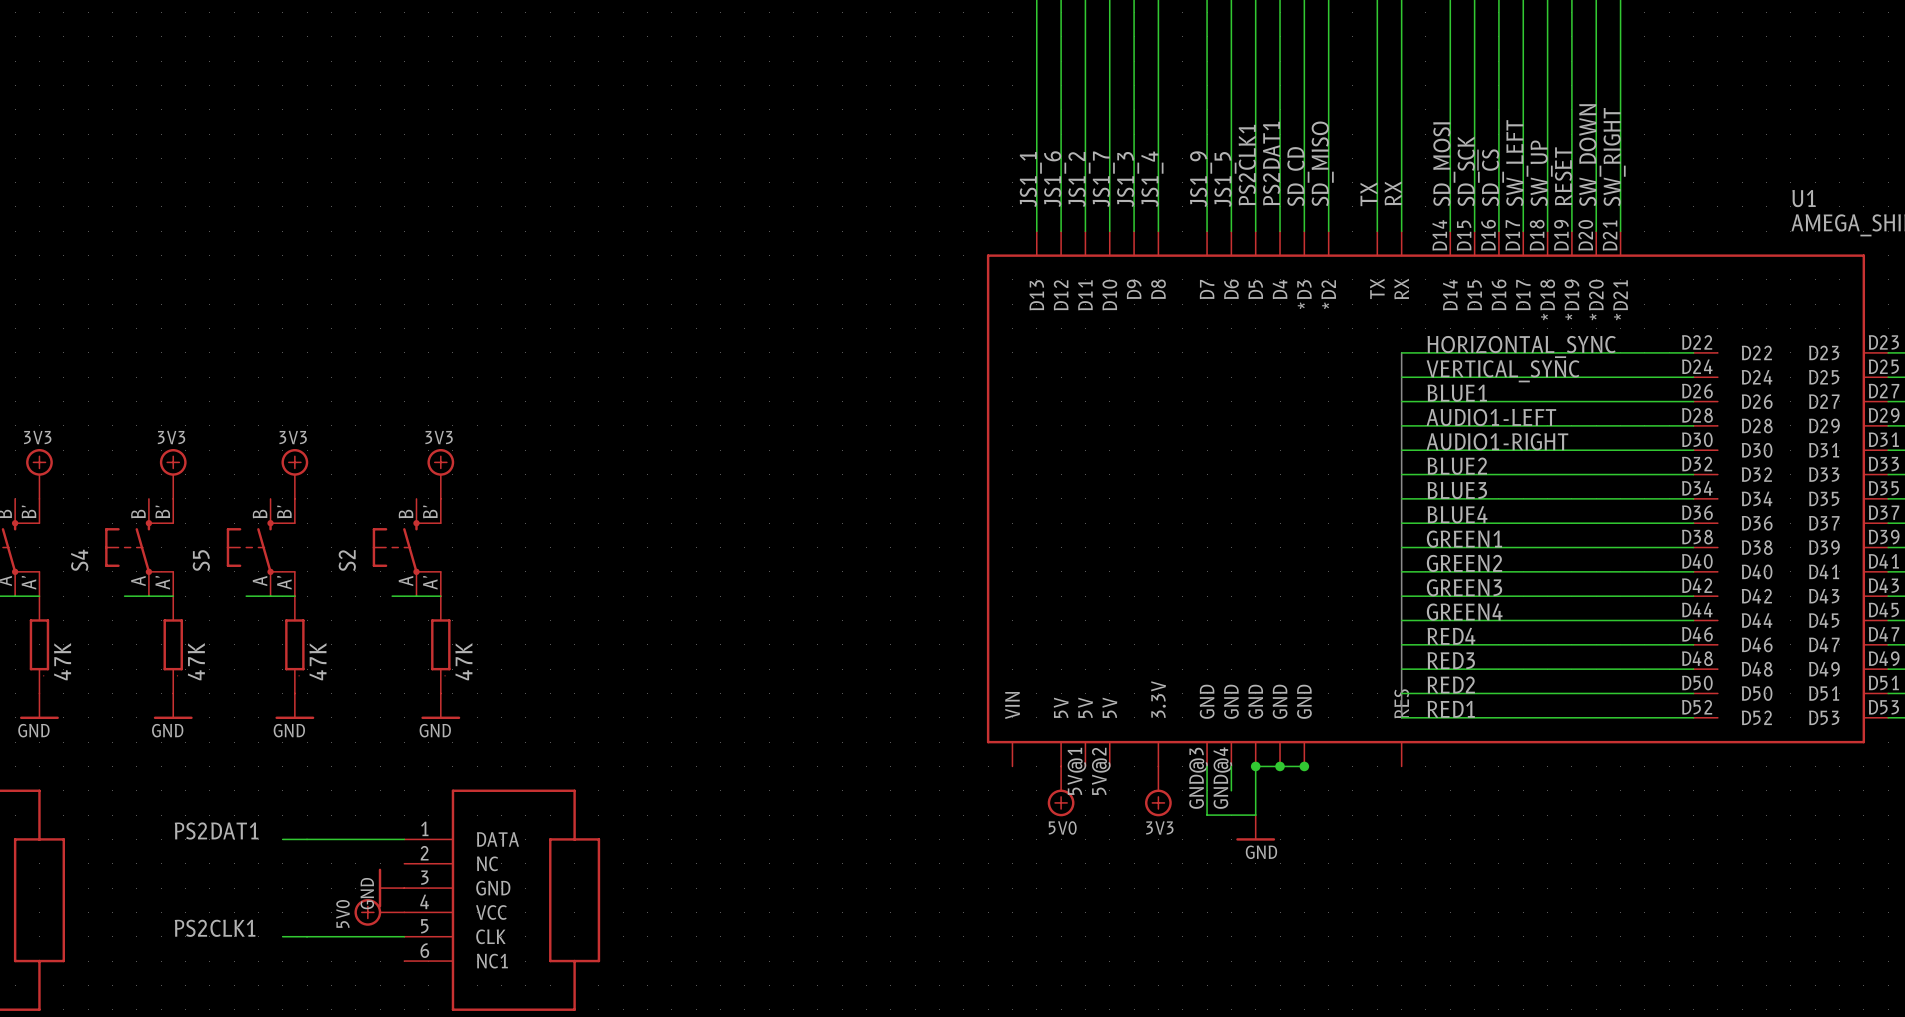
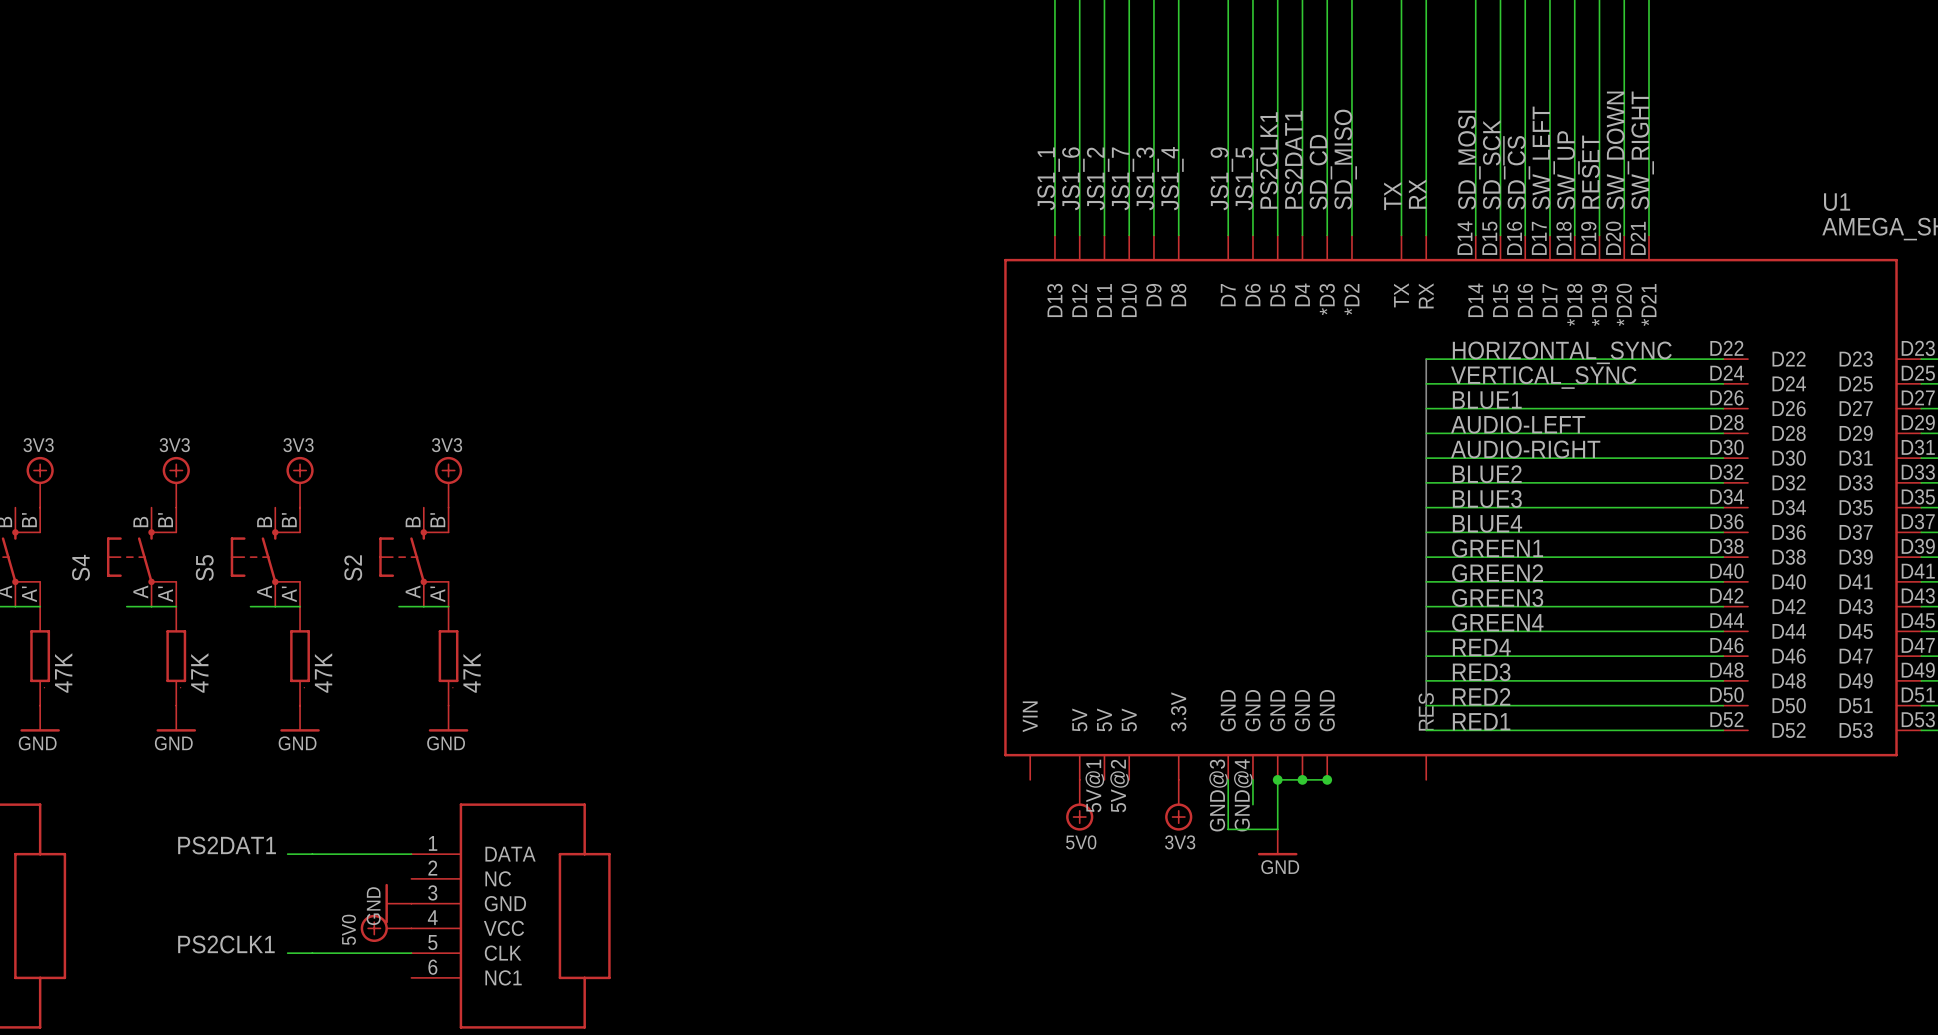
label: AUDIO1-LEFT (1491, 417) -> AUDIO-LEFT (1518, 424)
label: AUDIO1-RIGHT (1497, 441) -> AUDIO-RIGHT (1525, 449)

